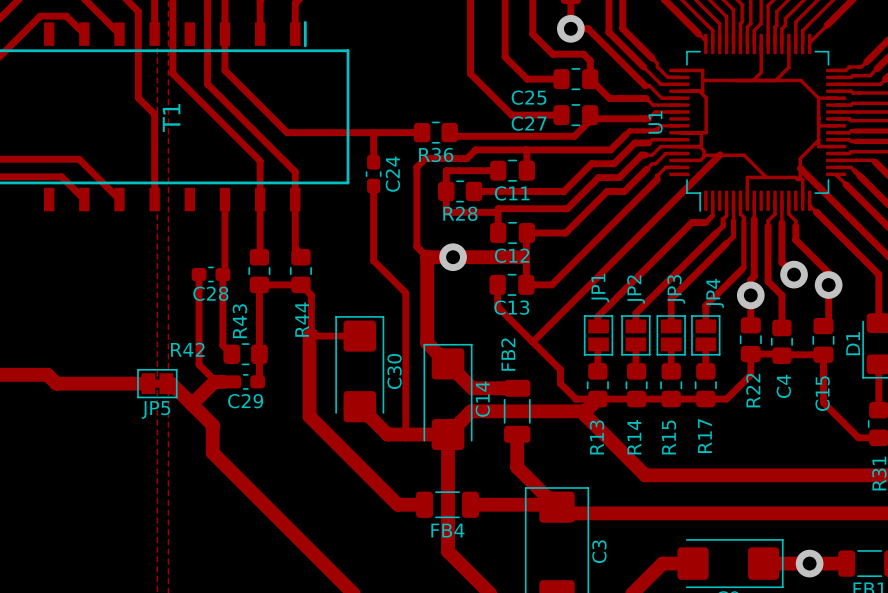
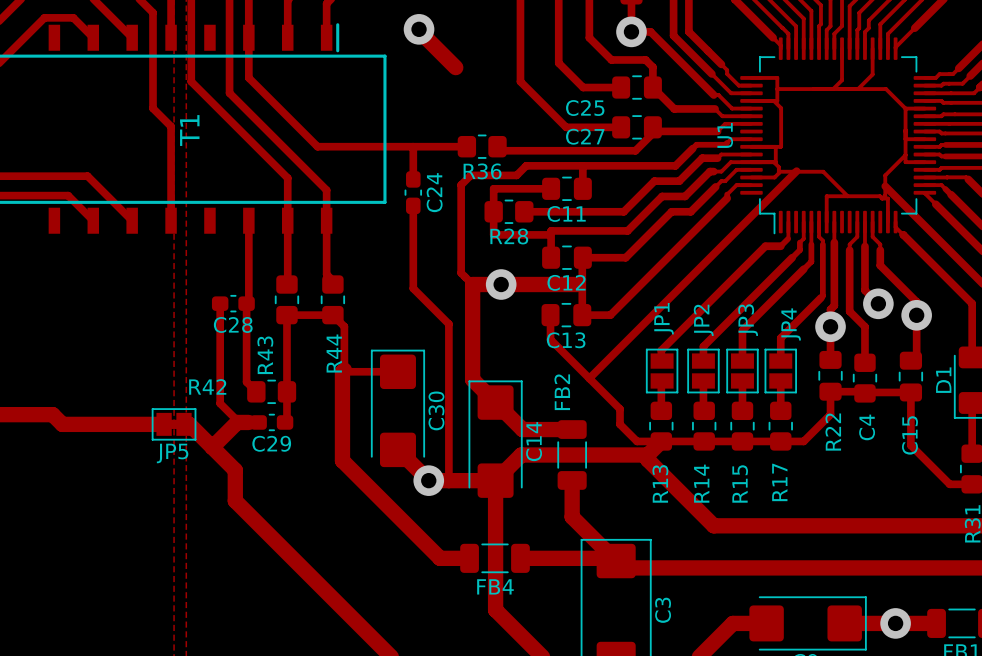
track: none -> (419, 29) (455, 67)
via: none -> (419, 29)
via: none -> (428, 480)

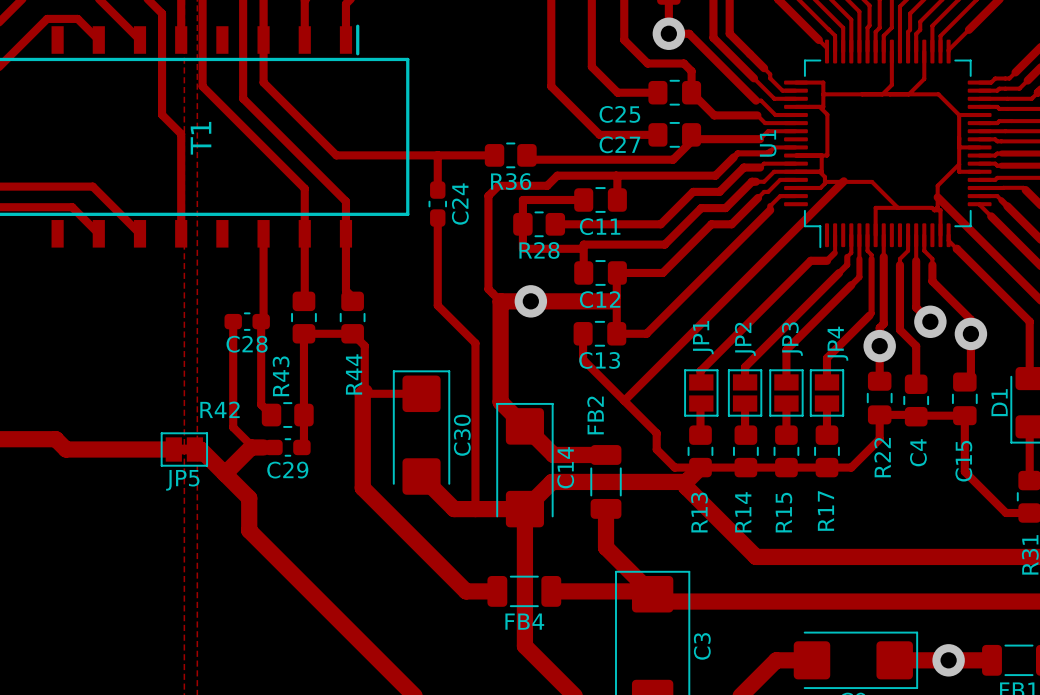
track: (419, 29) (455, 67) -> none
via: (419, 29) -> none
via: (428, 480) -> none

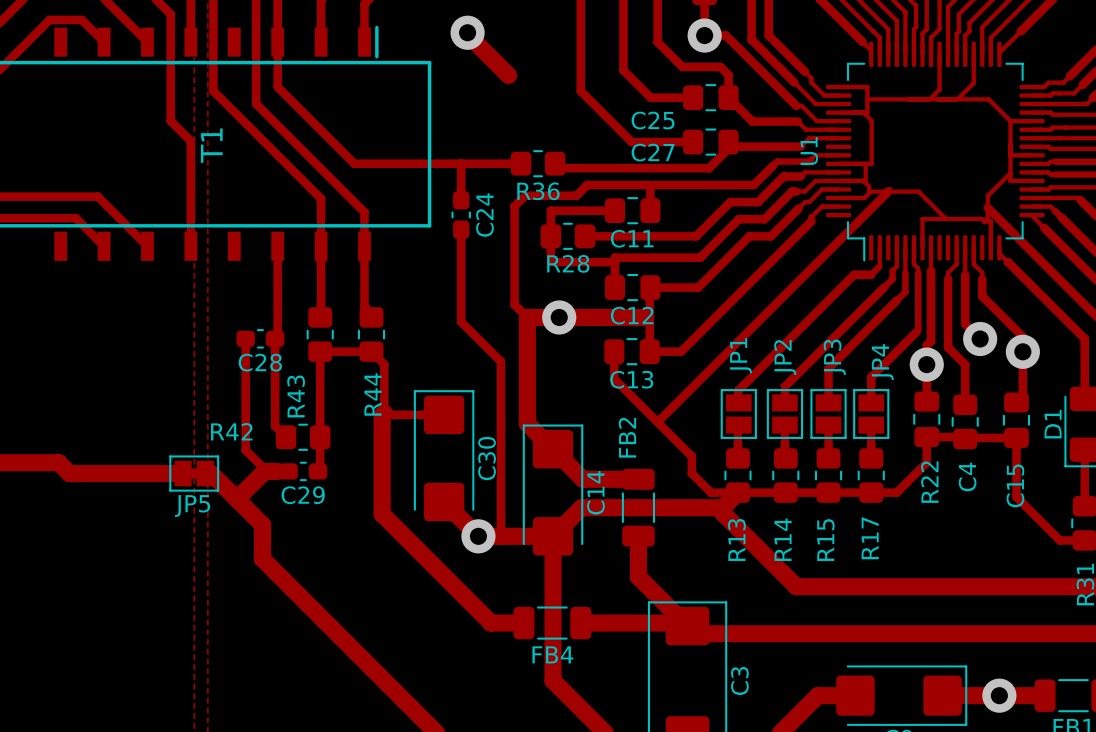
track: none -> (467, 32) (508, 75)
via: none -> (467, 32)
via: none -> (478, 536)

